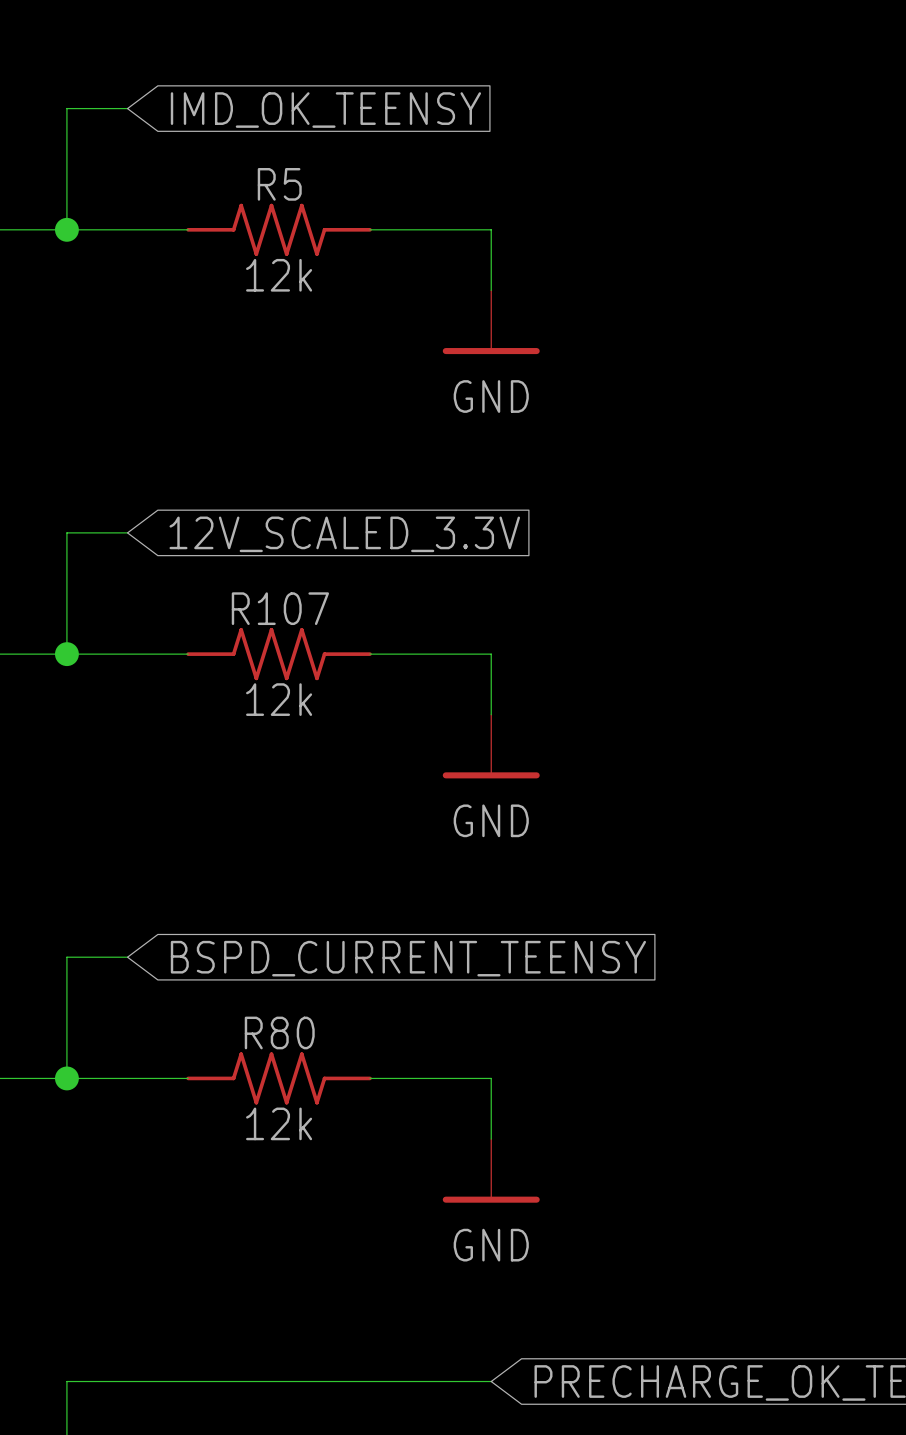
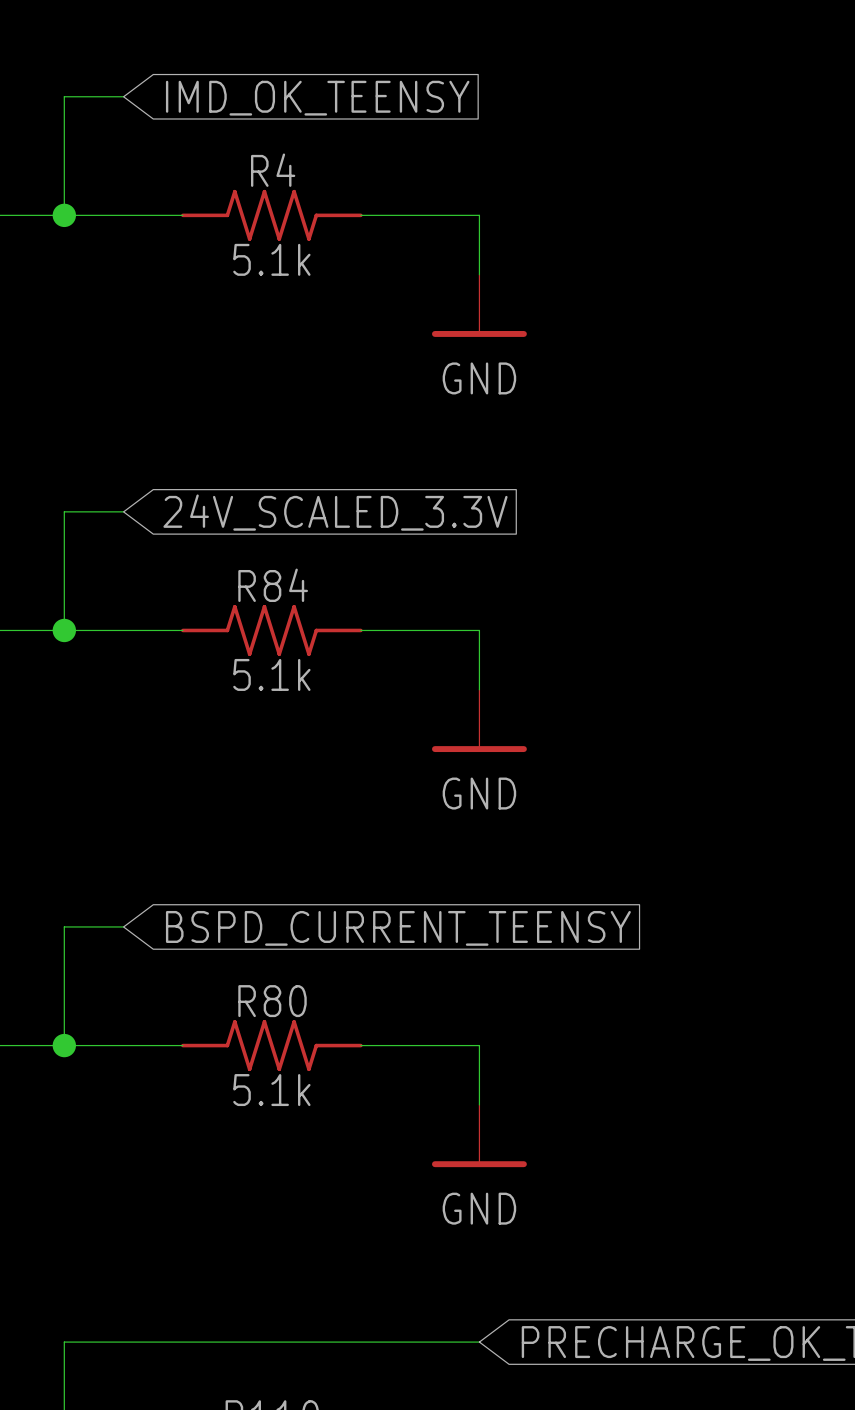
R5 name: R5 (279, 184) -> R4 (273, 170)
R5 text: 12k (279, 275) -> 5.1k (271, 259)
global label: 12V_SCALED_3.3V (344, 534) -> 24V_SCALED_3.3V (335, 512)
R107 name: R107 (280, 608) -> R84 (273, 585)
R107 text: 12k (279, 699) -> 5.1k (271, 674)
R80 text: 12k (279, 1123) -> 5.1k (271, 1090)

